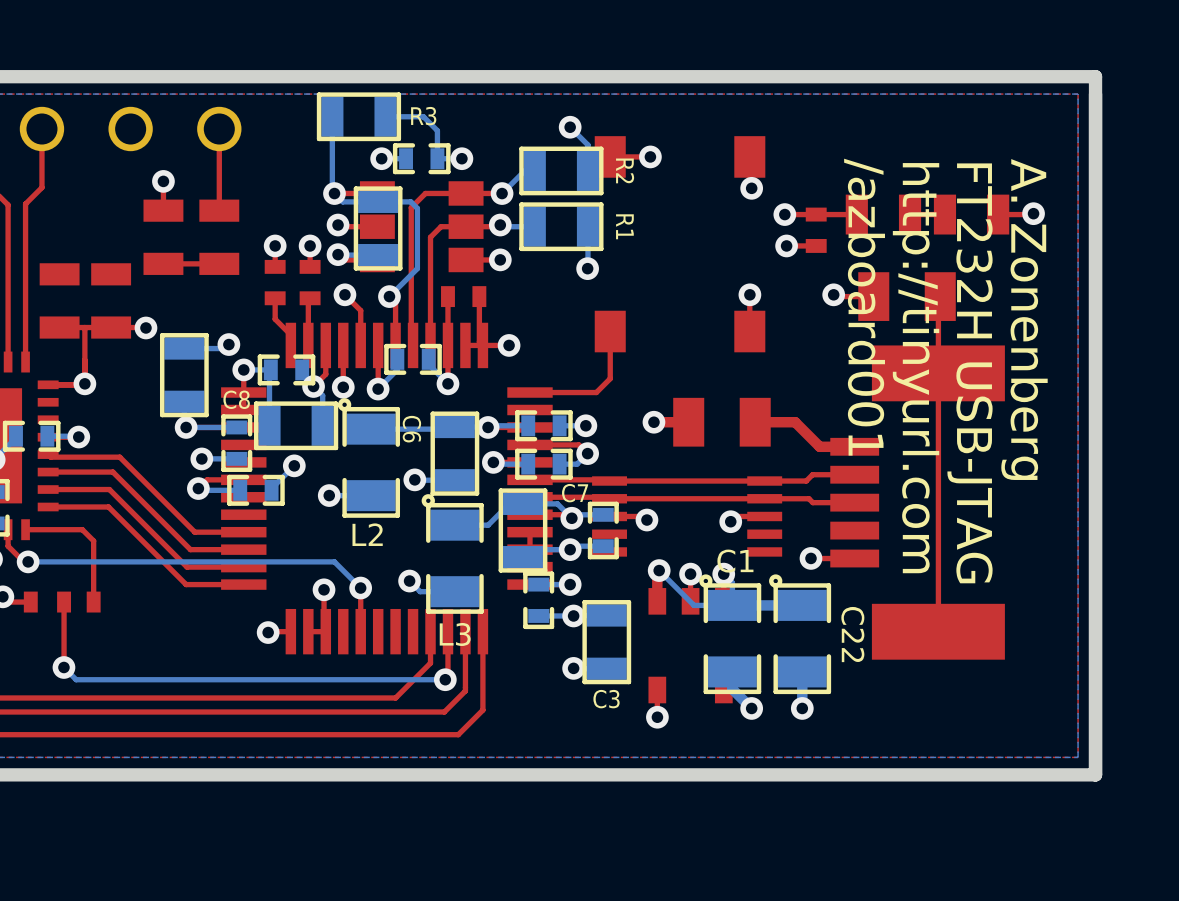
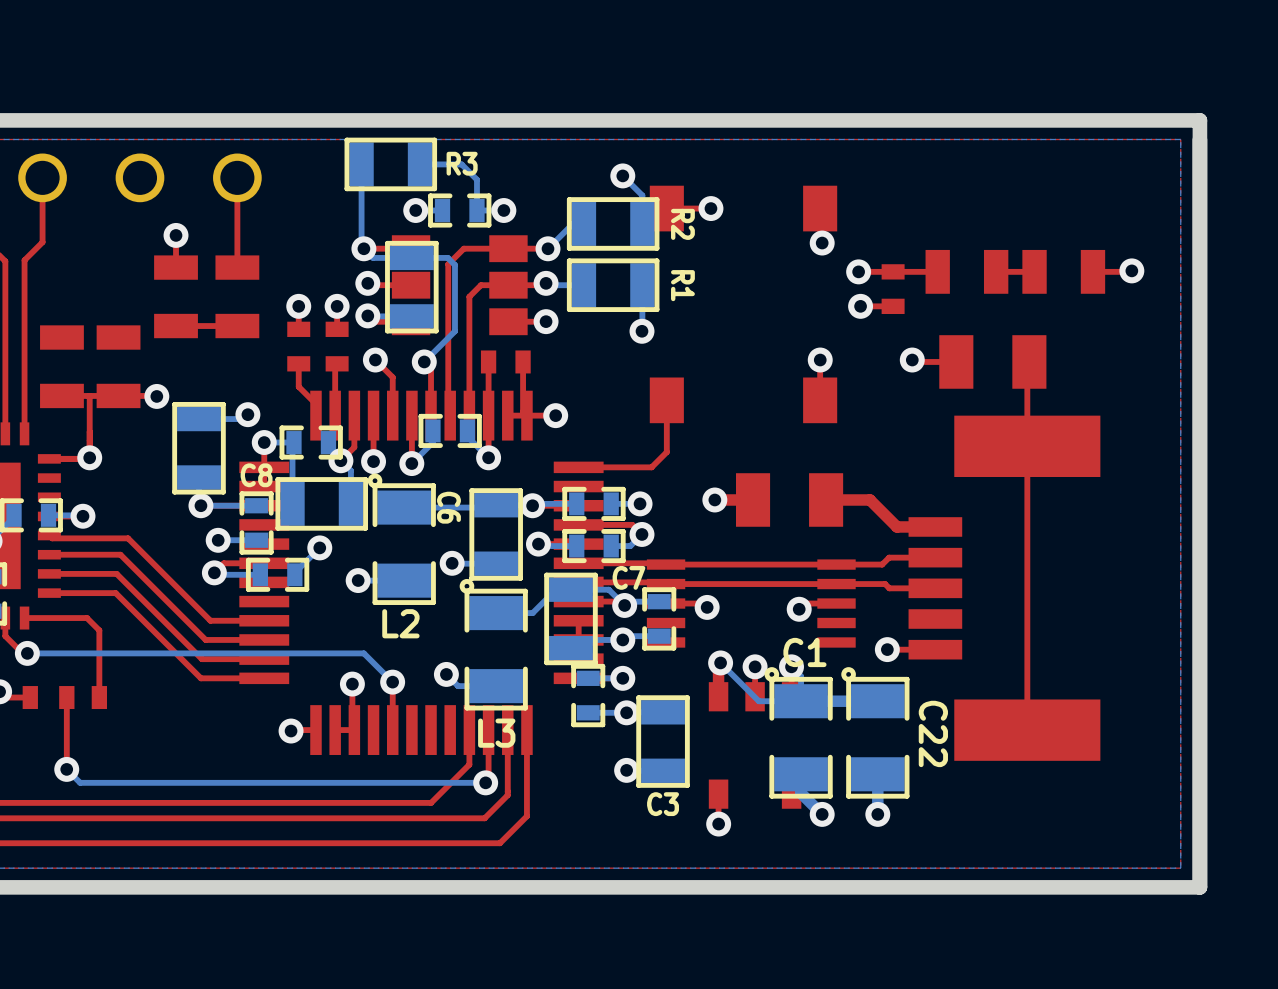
text: /azboard001 (864, 307) -> none
text: A. Zonenberg (1024, 319) -> none
text: http://tinyurl.com (916, 368) -> none
text: FT232H USB-JTAG (970, 373) -> none

